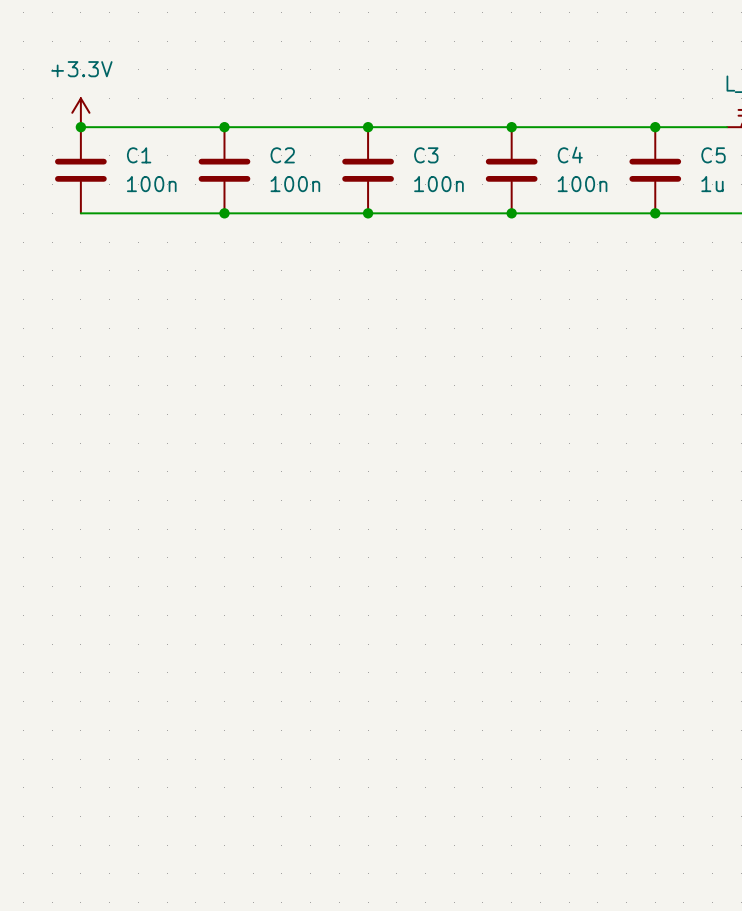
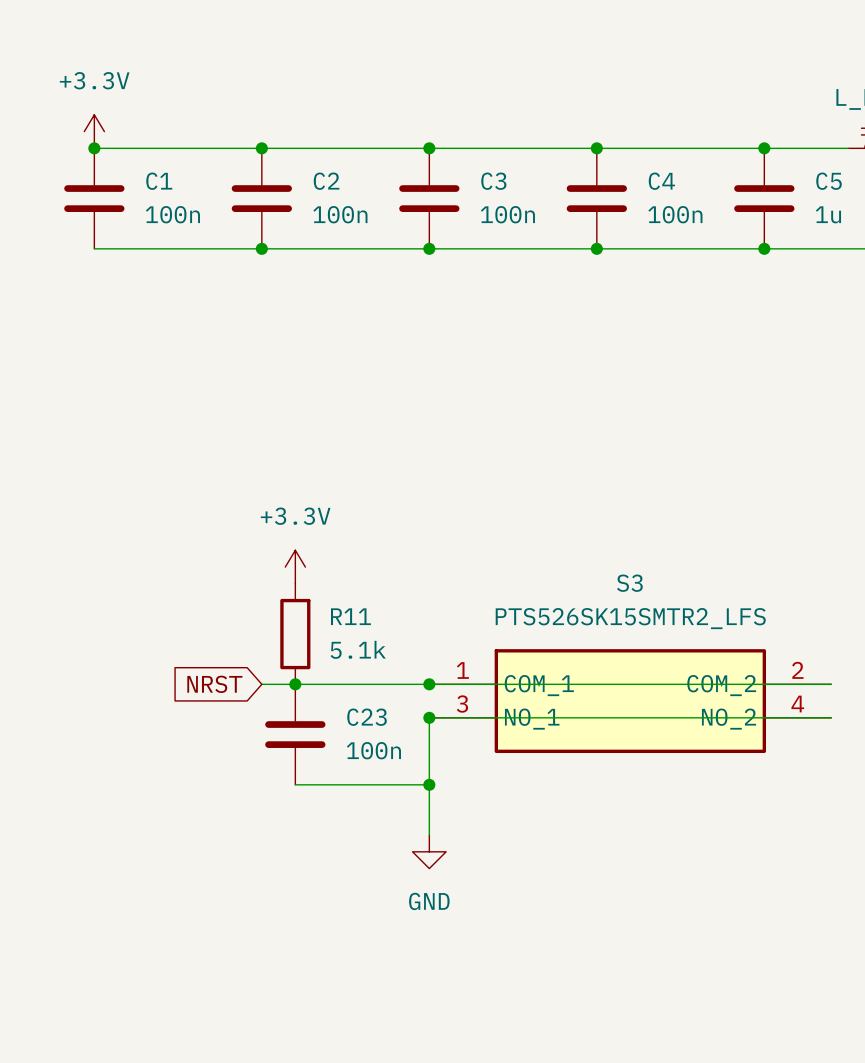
power symbol: none -> +3.3V (295, 567)
R11: none -> 5.1k (295, 634)
global label: none -> NRST (214, 684)
wire: none -> (261, 684) (831, 684)
junction: none -> (295, 684)
junction: none -> (429, 684)
S3: none -> PTS526SK15SMTR2_LFS (630, 701)
junction: none -> (429, 717)
wire: none -> (831, 717) (429, 717) (429, 835)
C23: none -> 100n (295, 734)
wire: none -> (295, 784) (429, 784)
junction: none -> (429, 784)
power symbol: none -> GND (429, 851)

